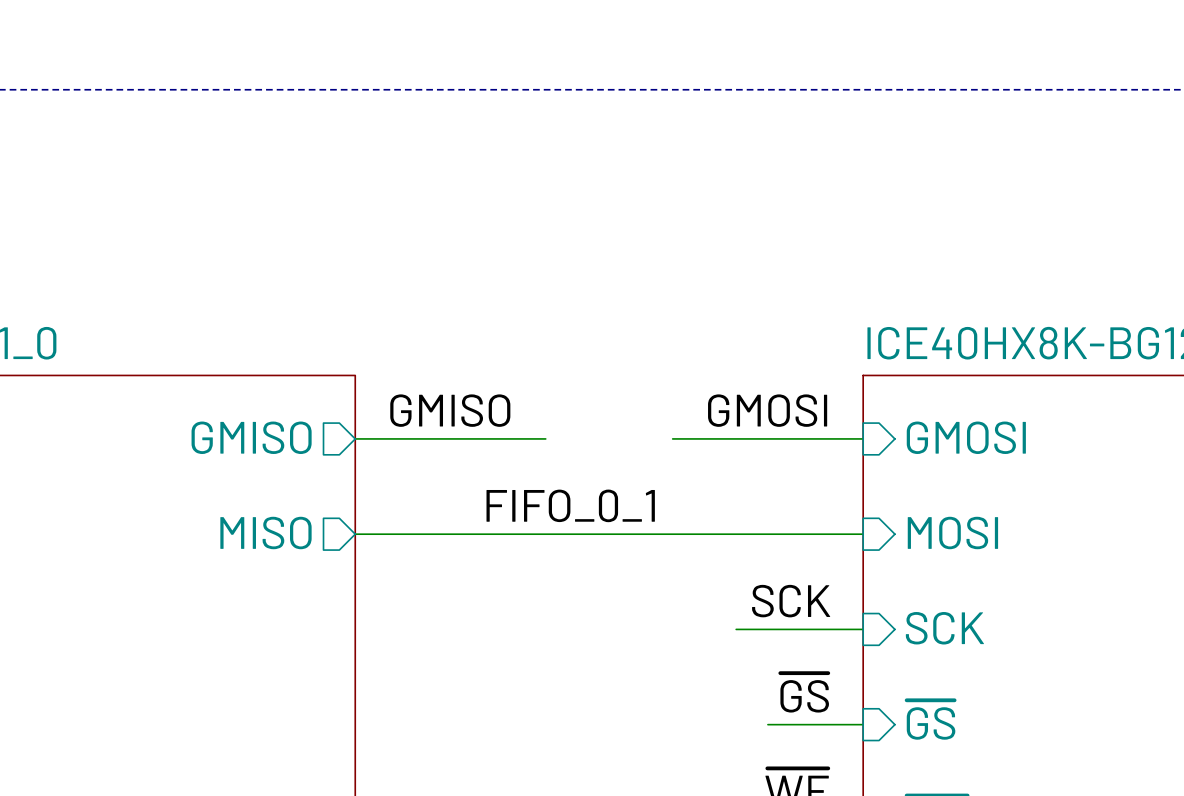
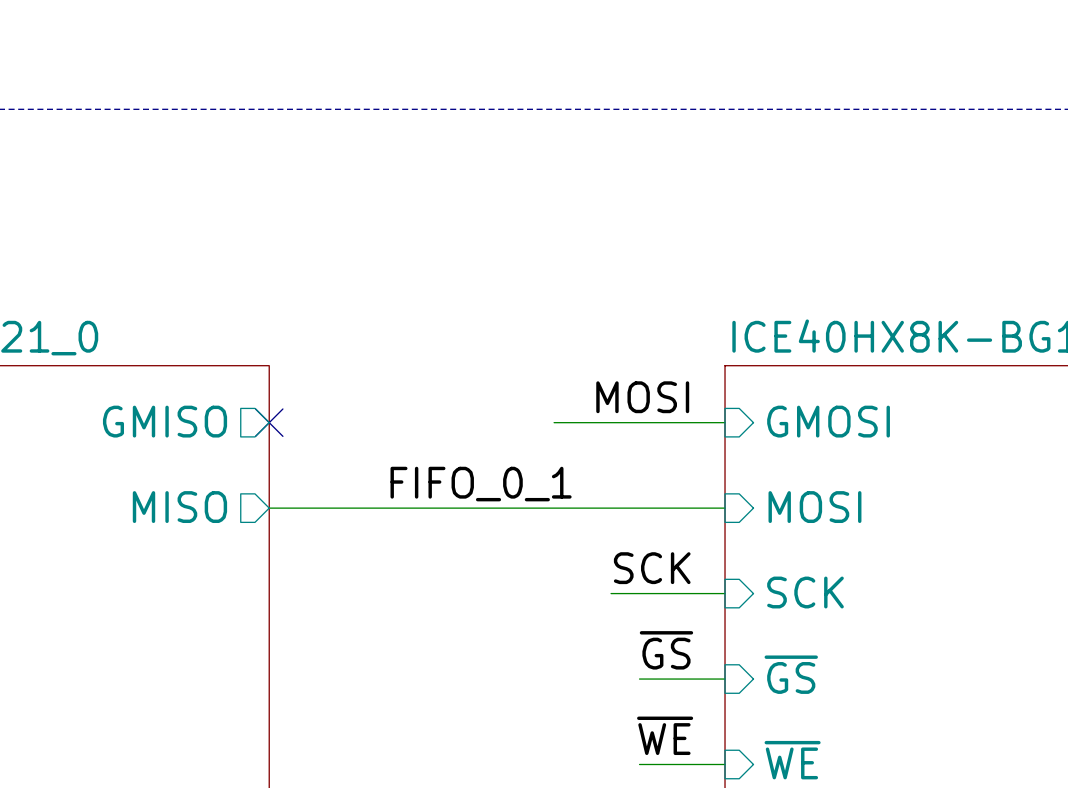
label: GMISO (450, 410) -> none
label: GMOSI (767, 410) -> MOSI (642, 397)
wire: (355, 438) (545, 438) -> none
no-connect mark: none -> (269, 422)

